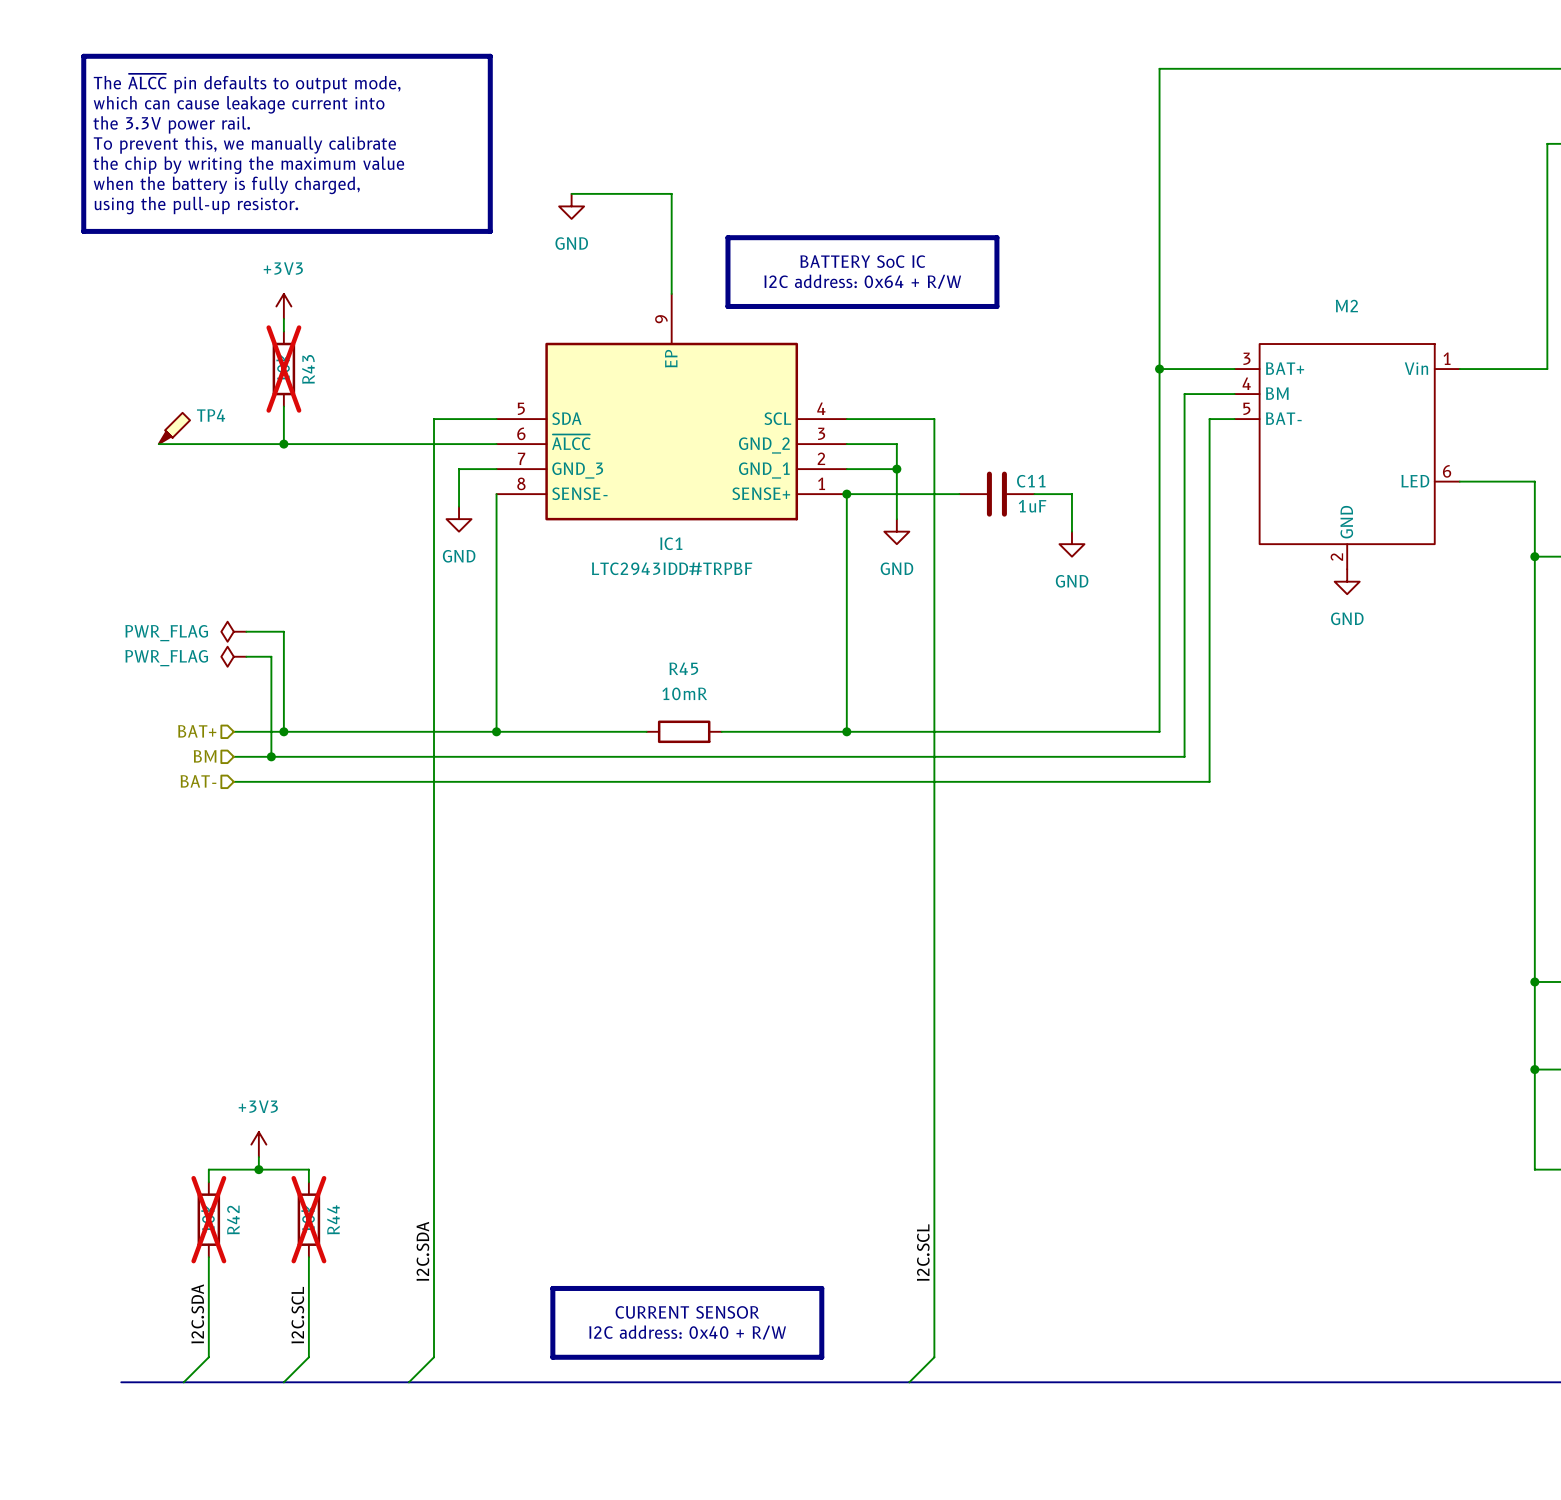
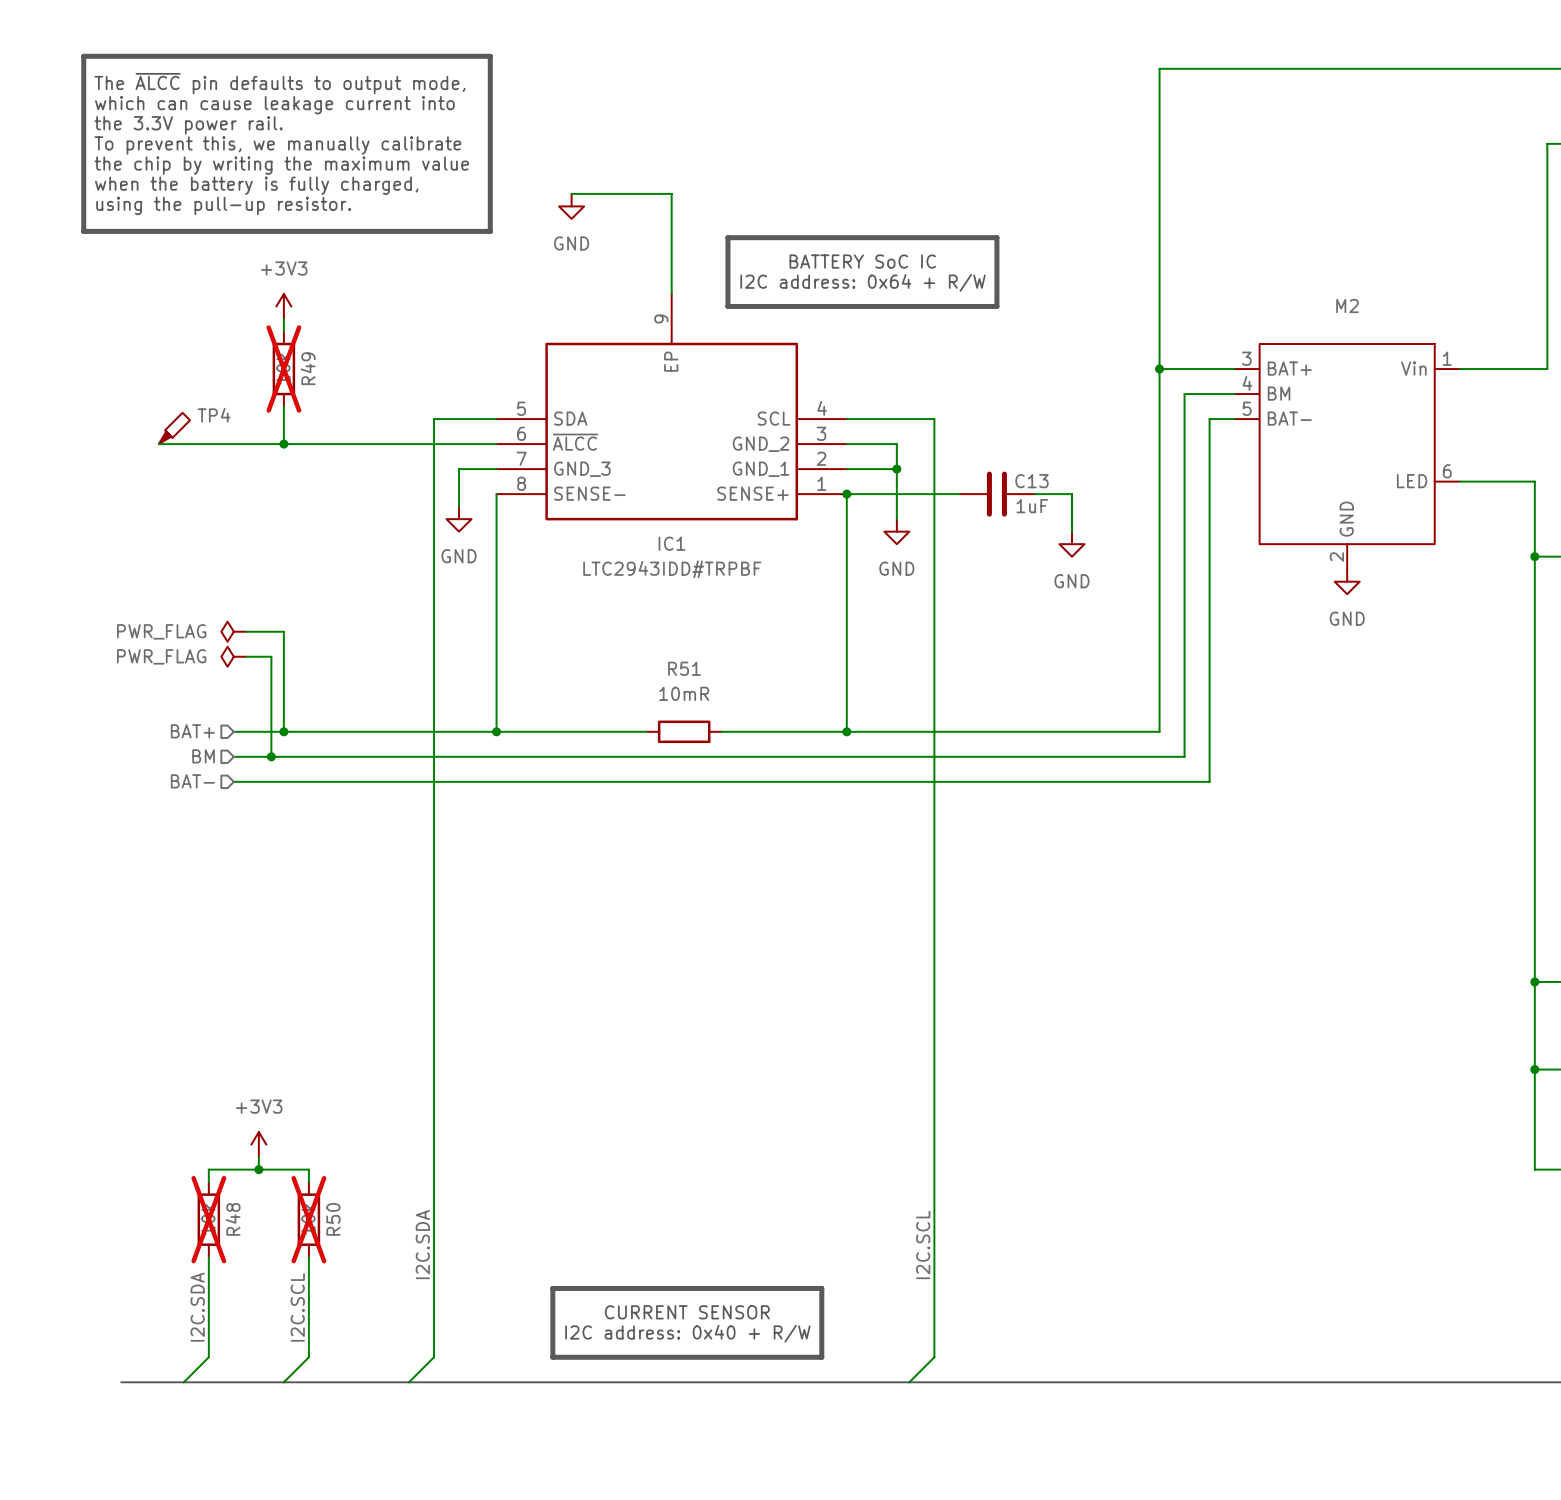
R43 name: R43 (308, 369) -> R49 (308, 368)
C11 name: C11 (1031, 481) -> C13 (1031, 481)
R45 name: R45 (683, 668) -> R51 (684, 668)
R44 name: R44 (333, 1219) -> R50 (333, 1219)
R42 name: R42 (233, 1220) -> R48 (233, 1219)

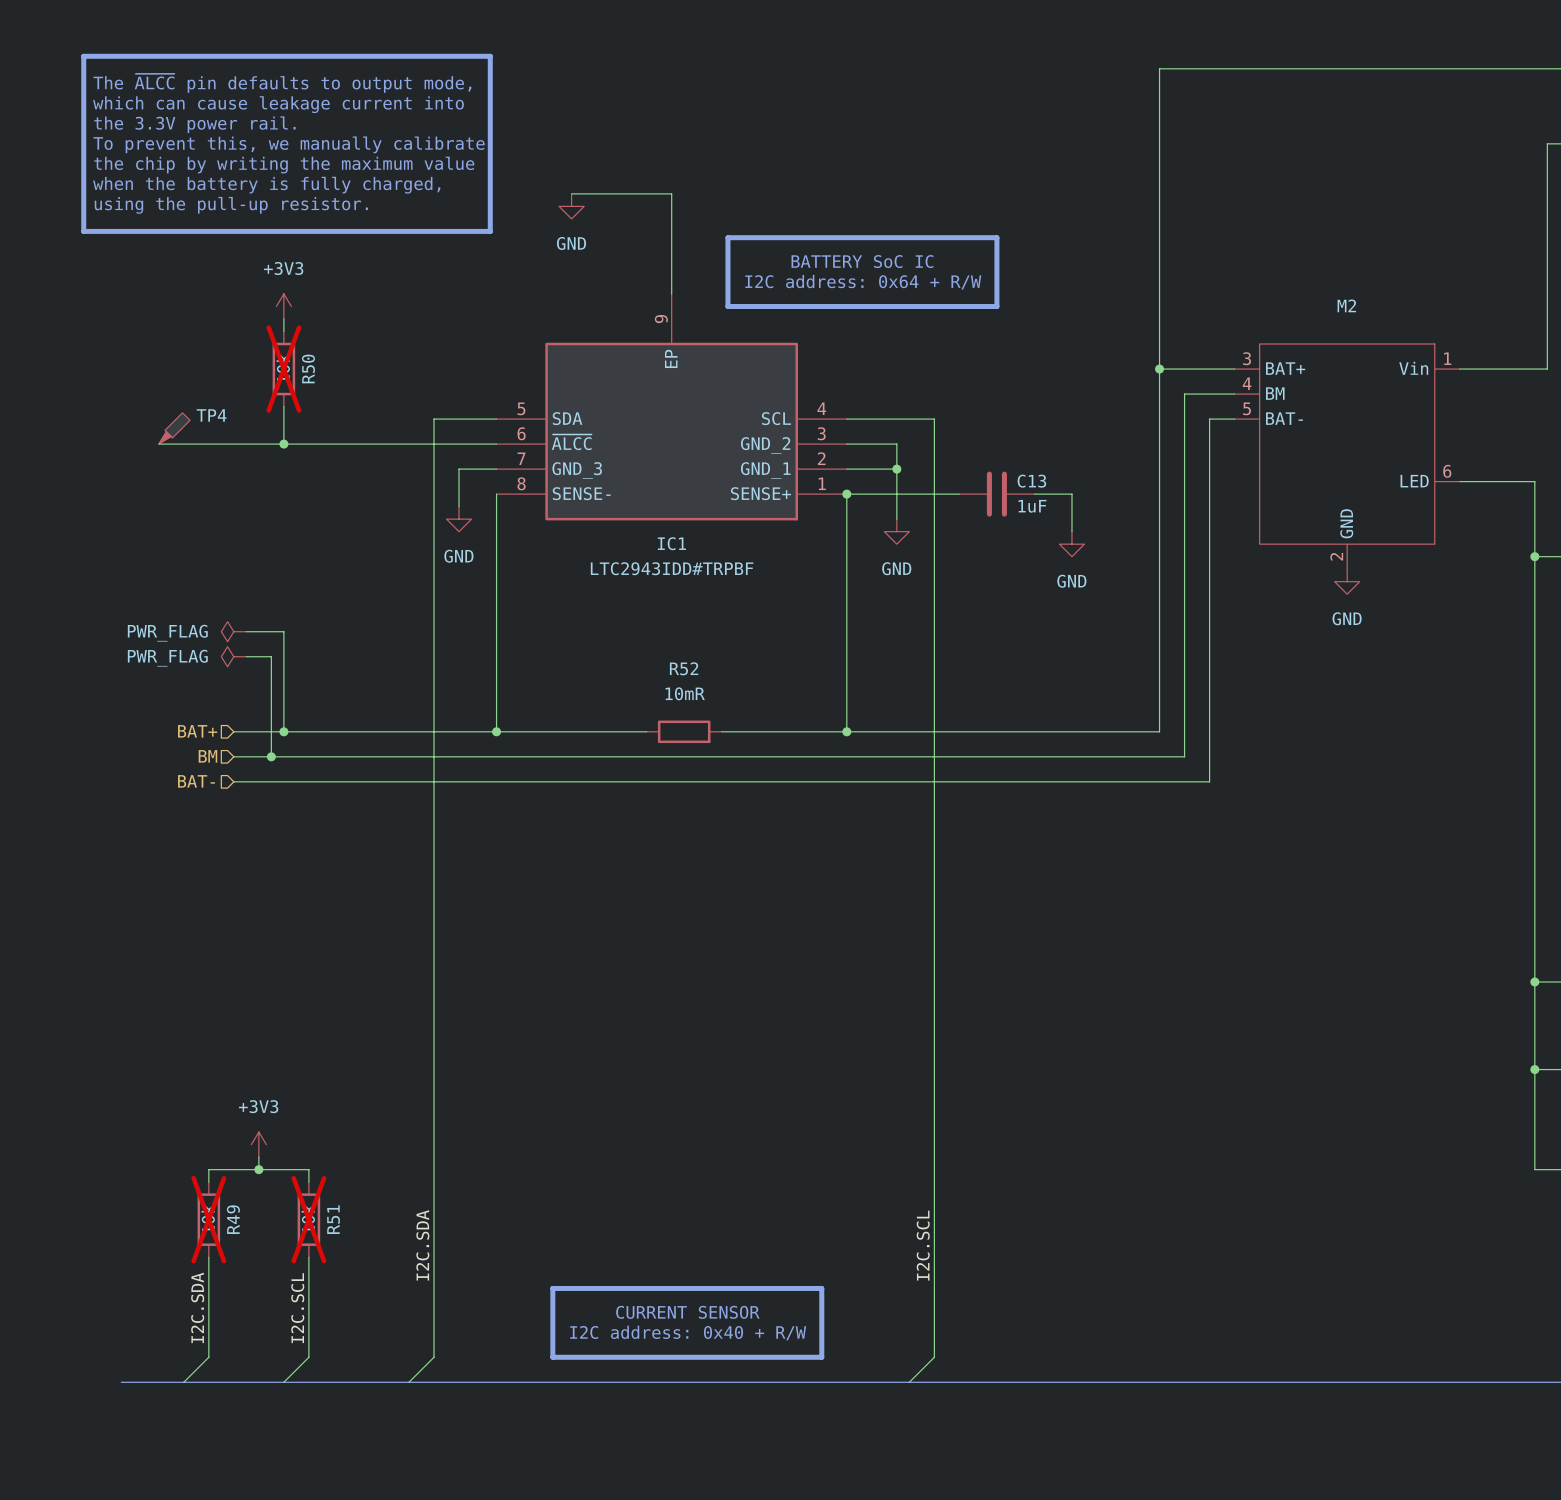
R49 name: R49 (308, 368) -> R50 (308, 368)
R51 name: R51 (684, 668) -> R52 (684, 668)
R48 name: R48 (233, 1219) -> R49 (233, 1219)
R50 name: R50 (333, 1219) -> R51 (333, 1219)

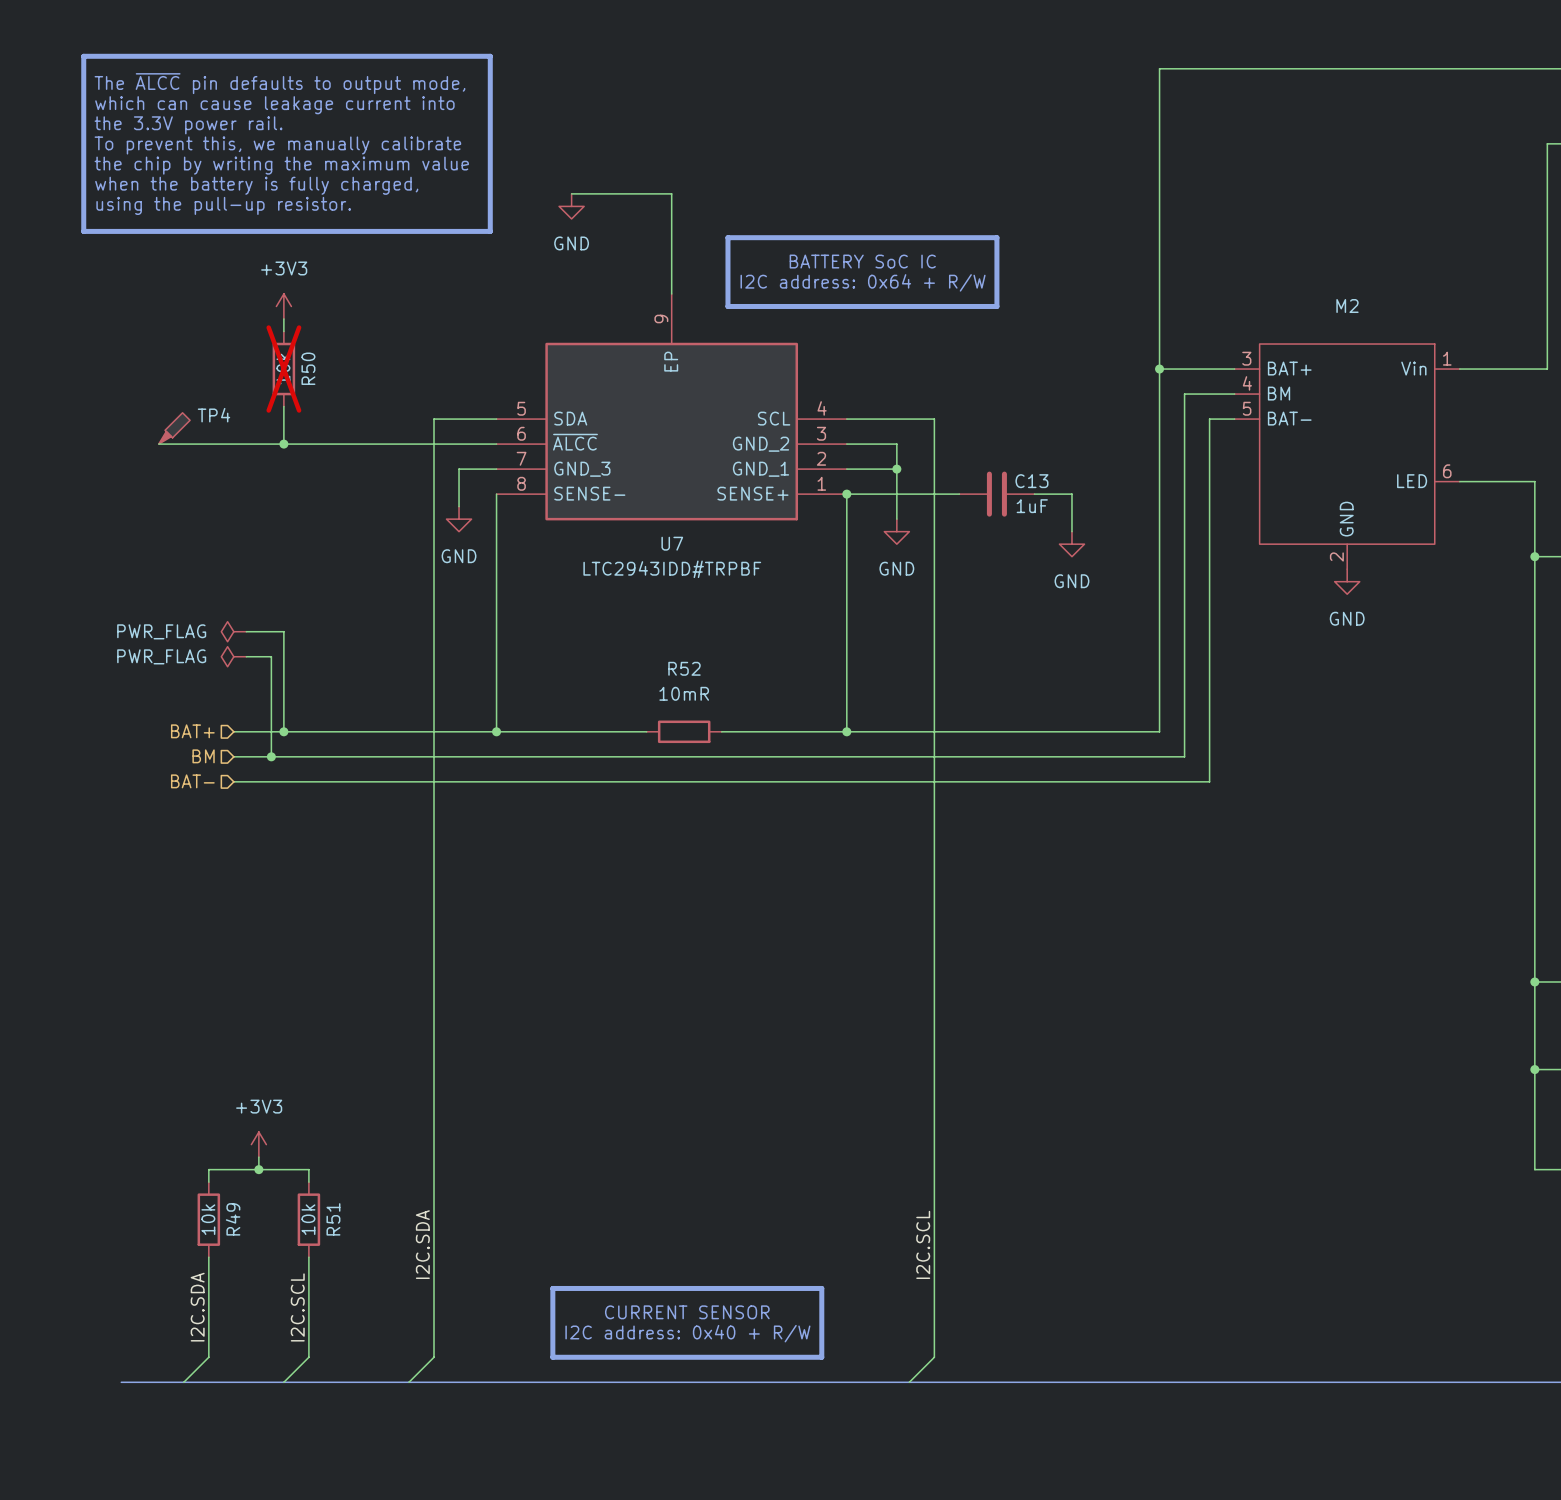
IC1 name: IC1 (671, 543) -> U7 (672, 543)
R49 do-not-place cross: (208, 1219) -> none
R51 do-not-place cross: (308, 1219) -> none

